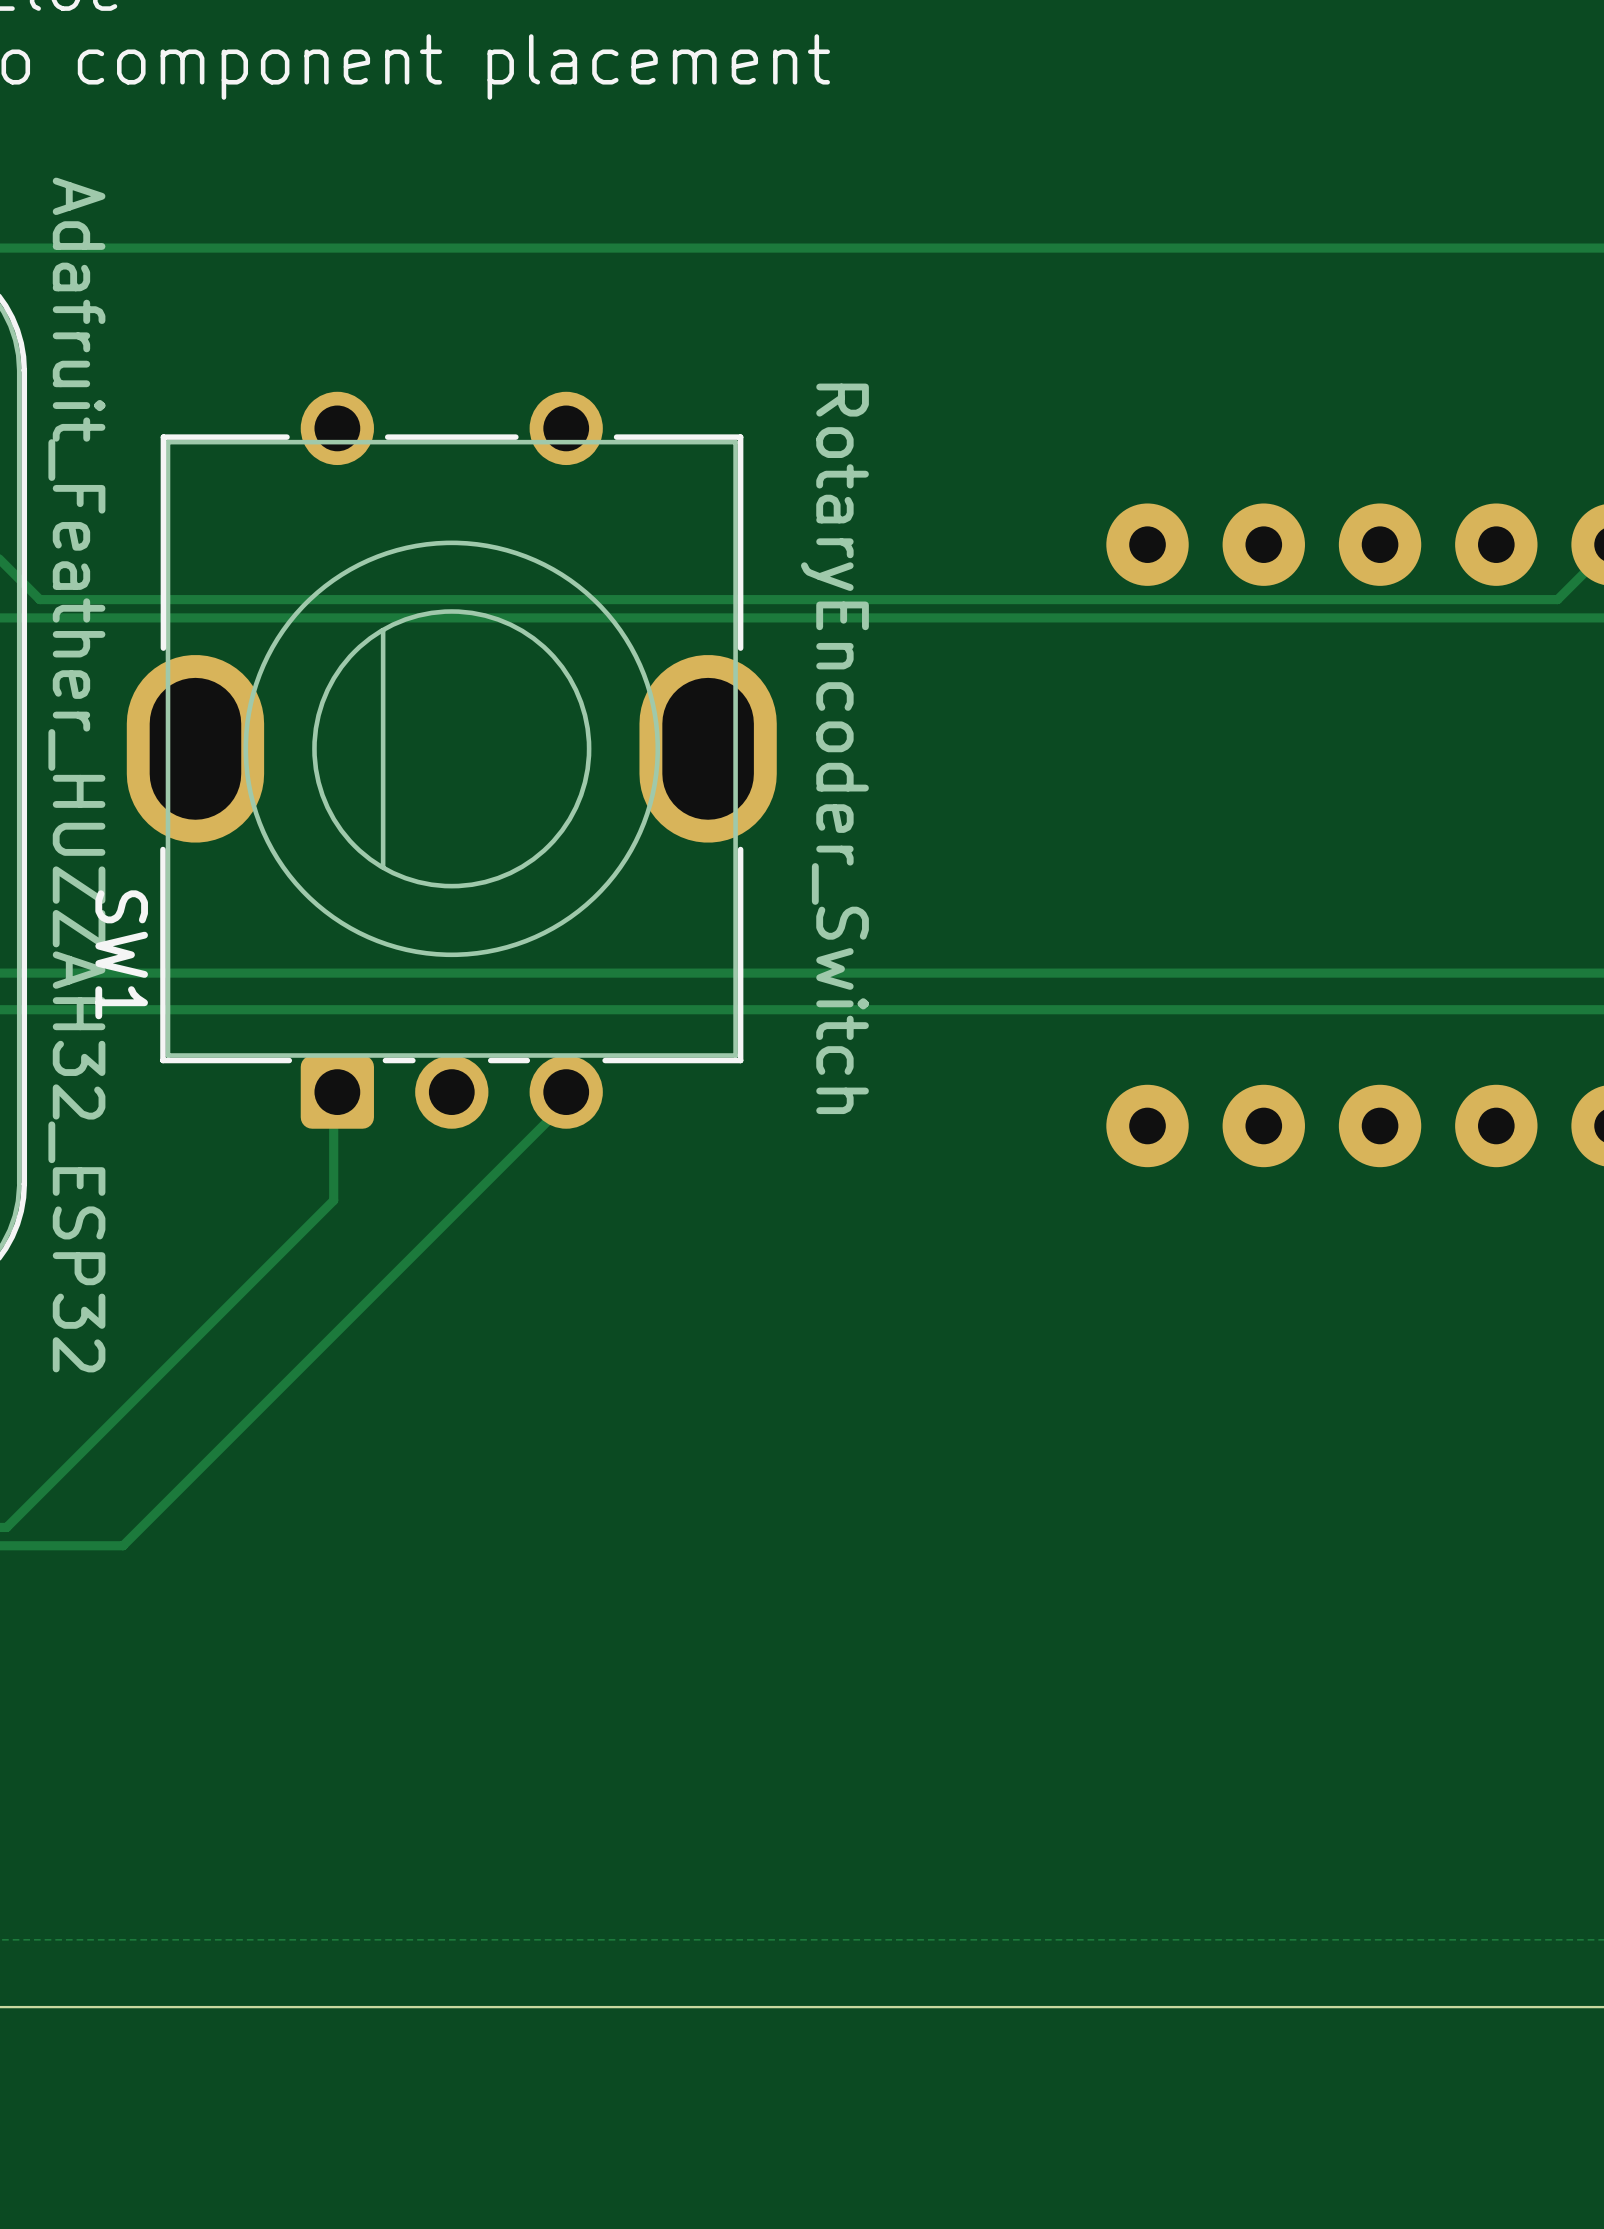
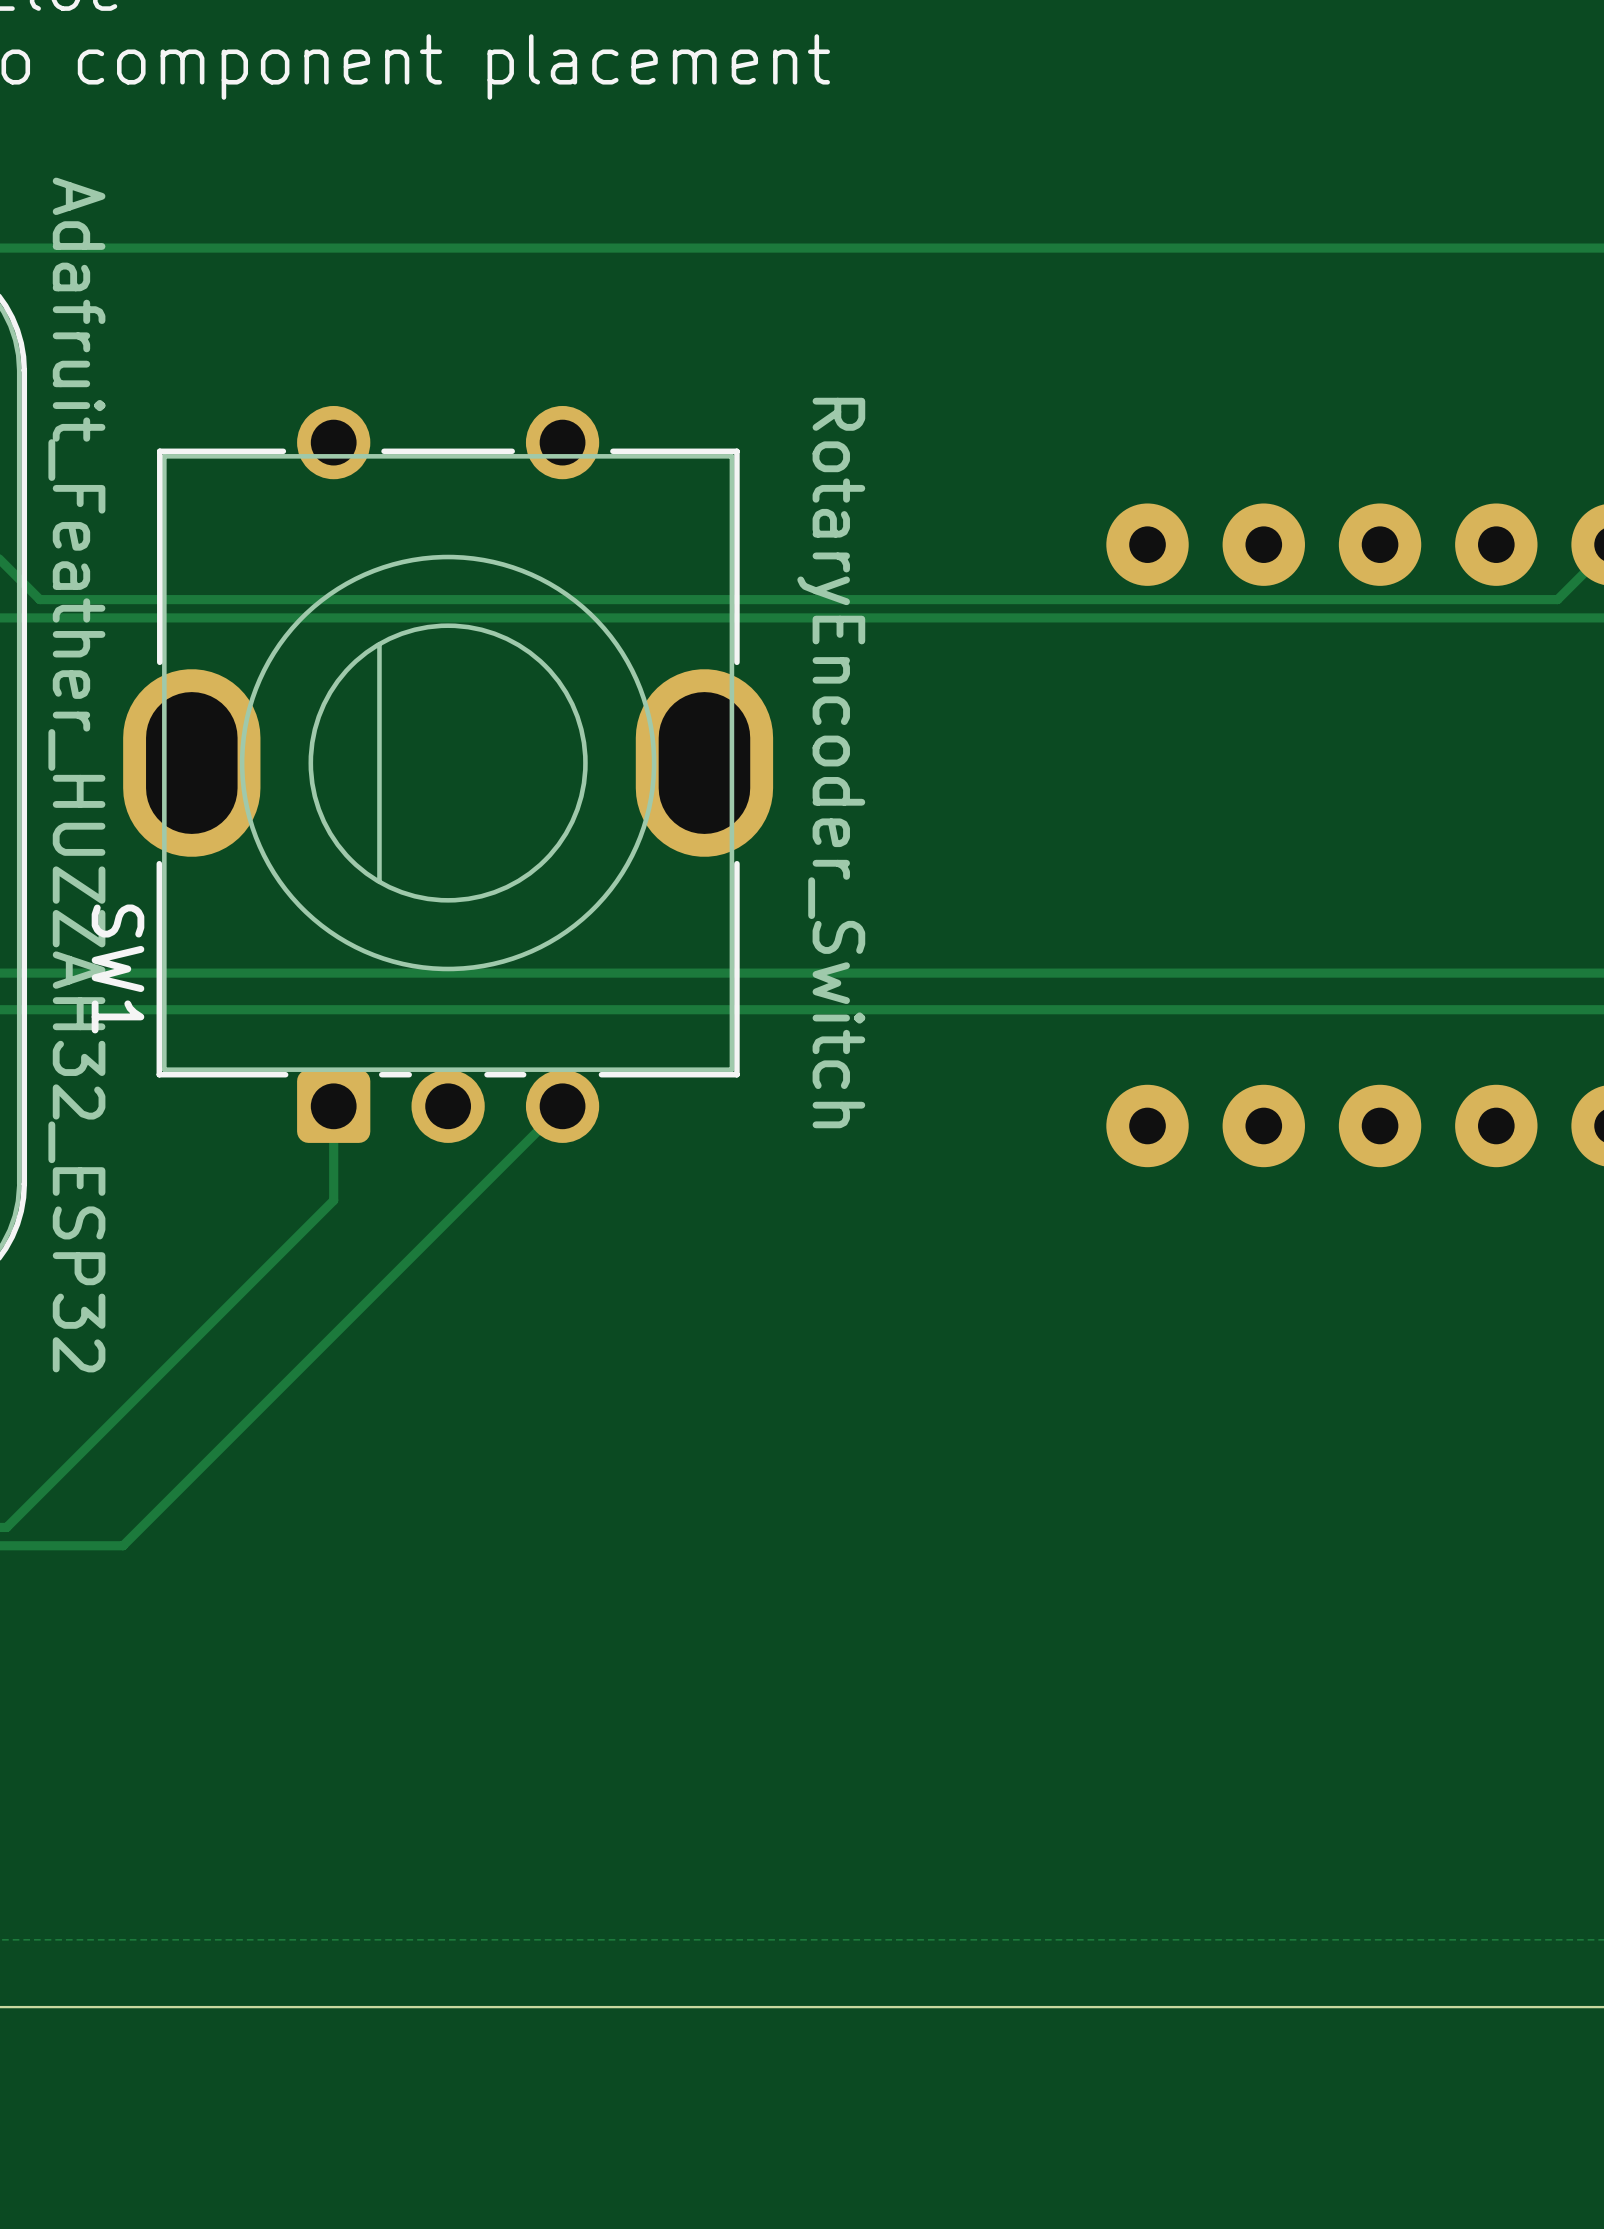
SW1 position: (451, 760) -> (448, 774)

